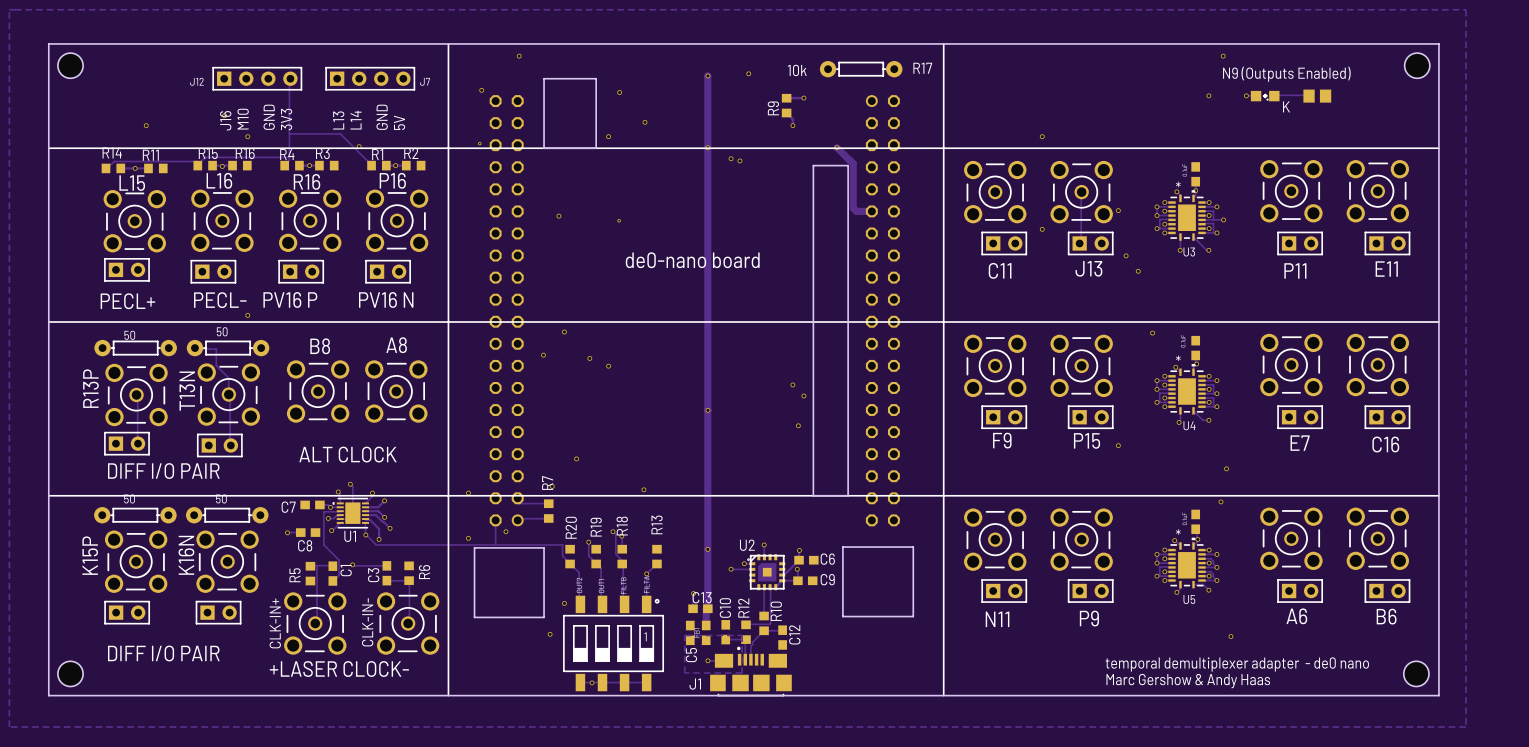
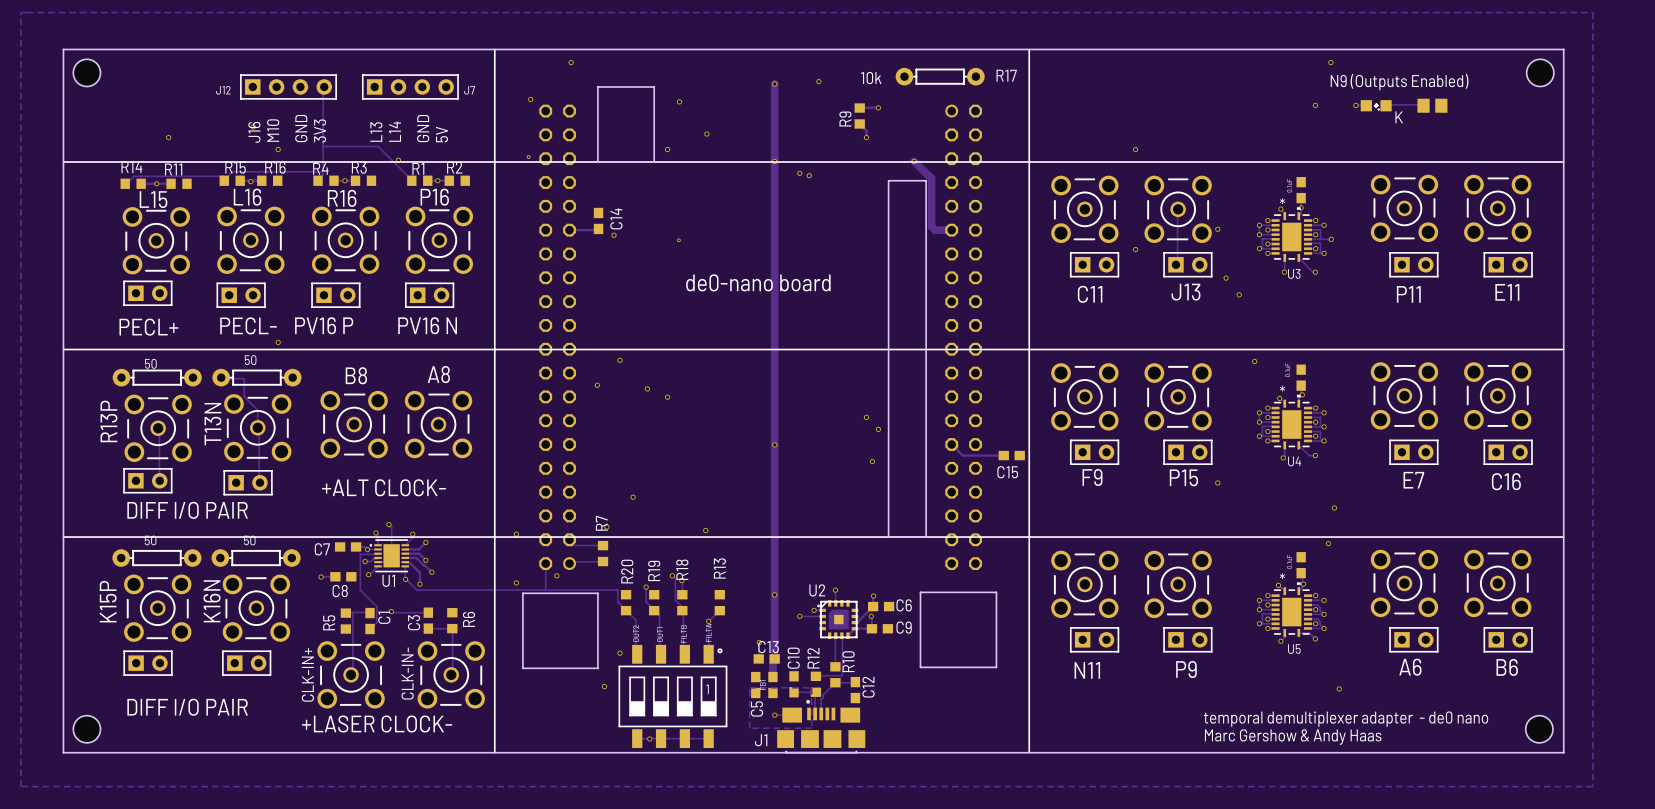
C14: none -> (598, 220)
track: none -> (598, 228) (569, 230)
track: none -> (951, 444) (962, 455) (1003, 455)
C15: none -> (1011, 455)
text: ALT CLOCK (347, 454) -> +ALT CLOCK- (383, 487)

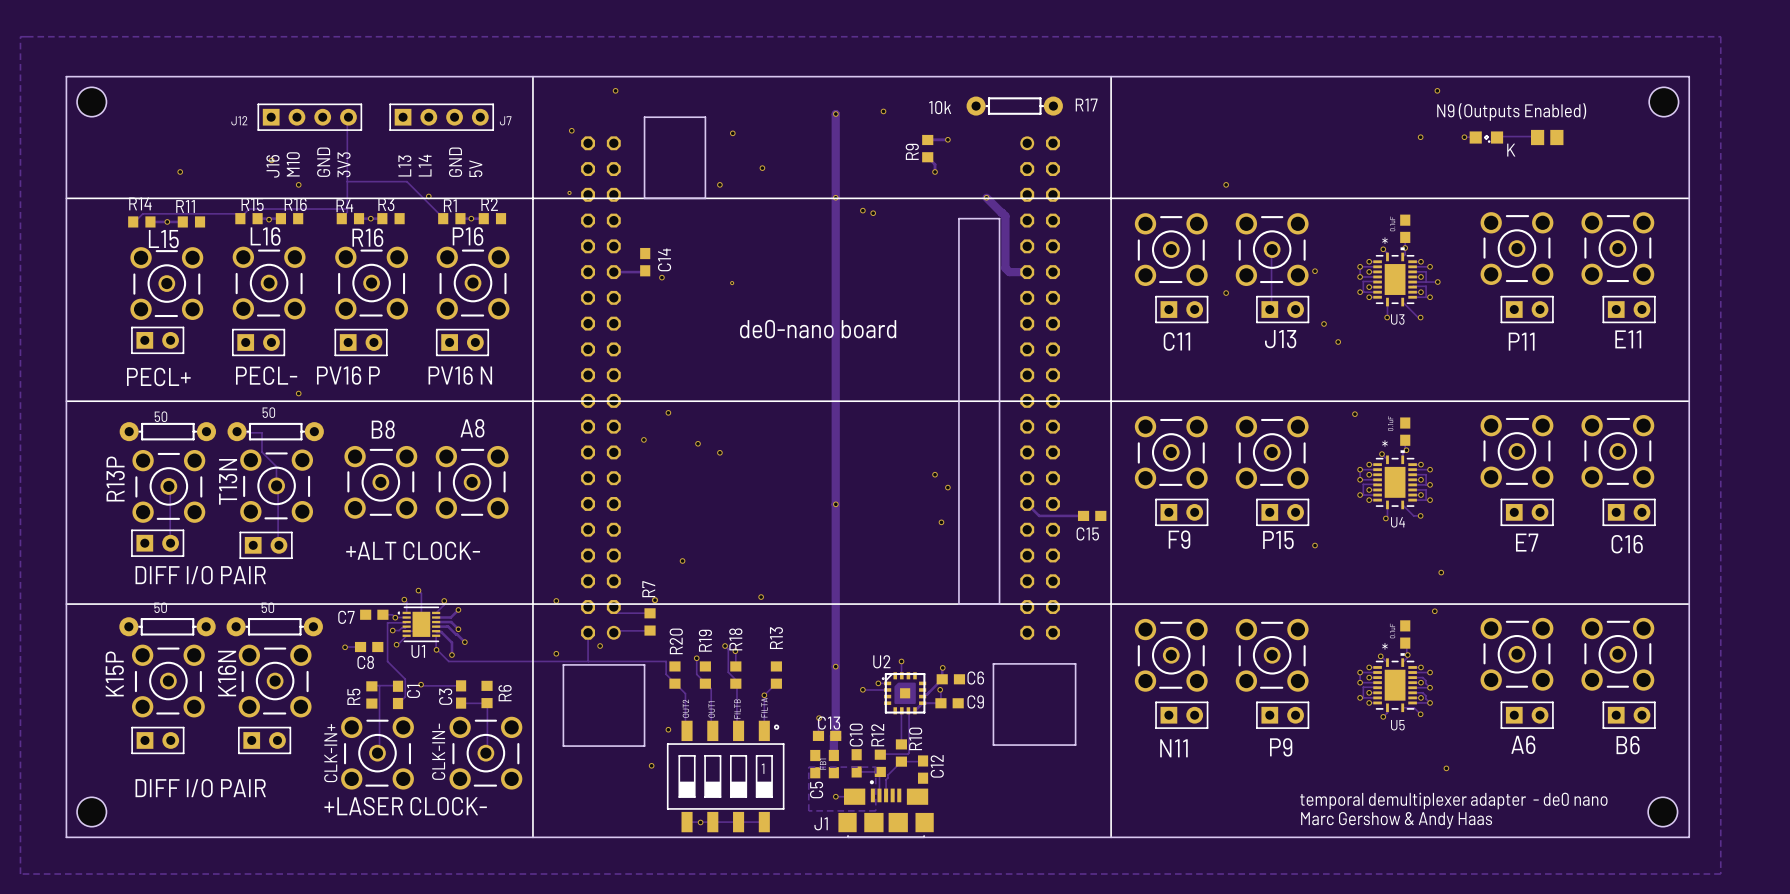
via: (606, 527) -> none
via: none -> (654, 600)

